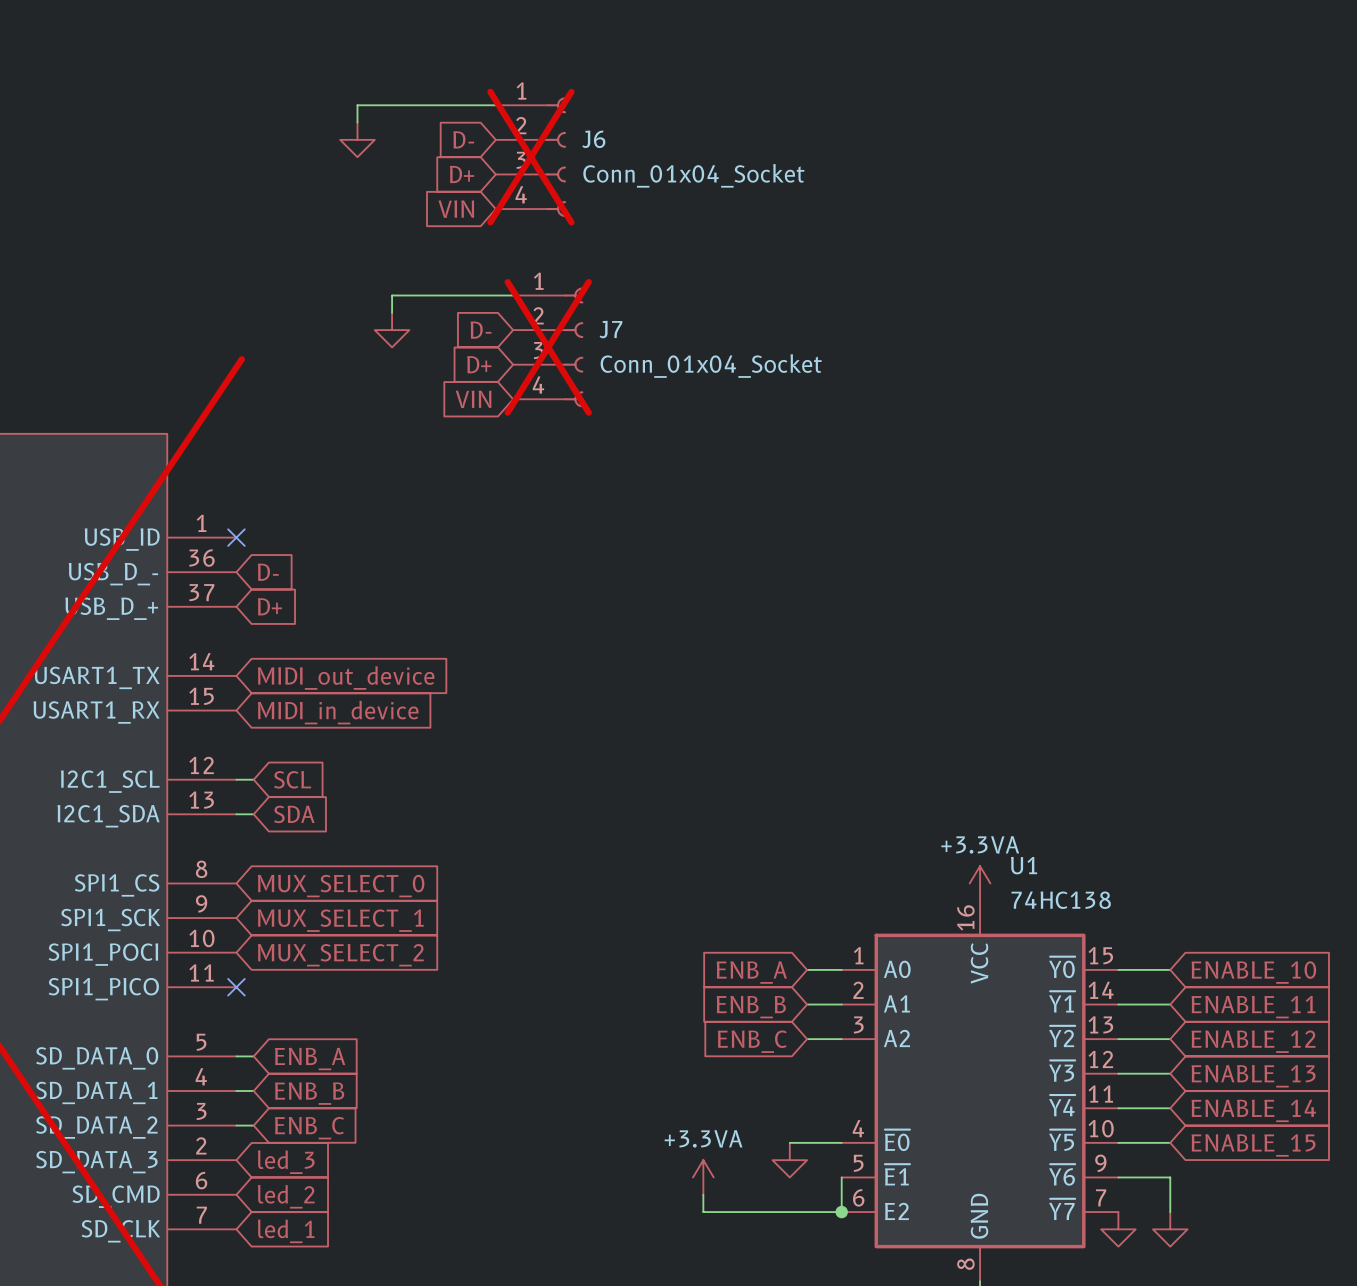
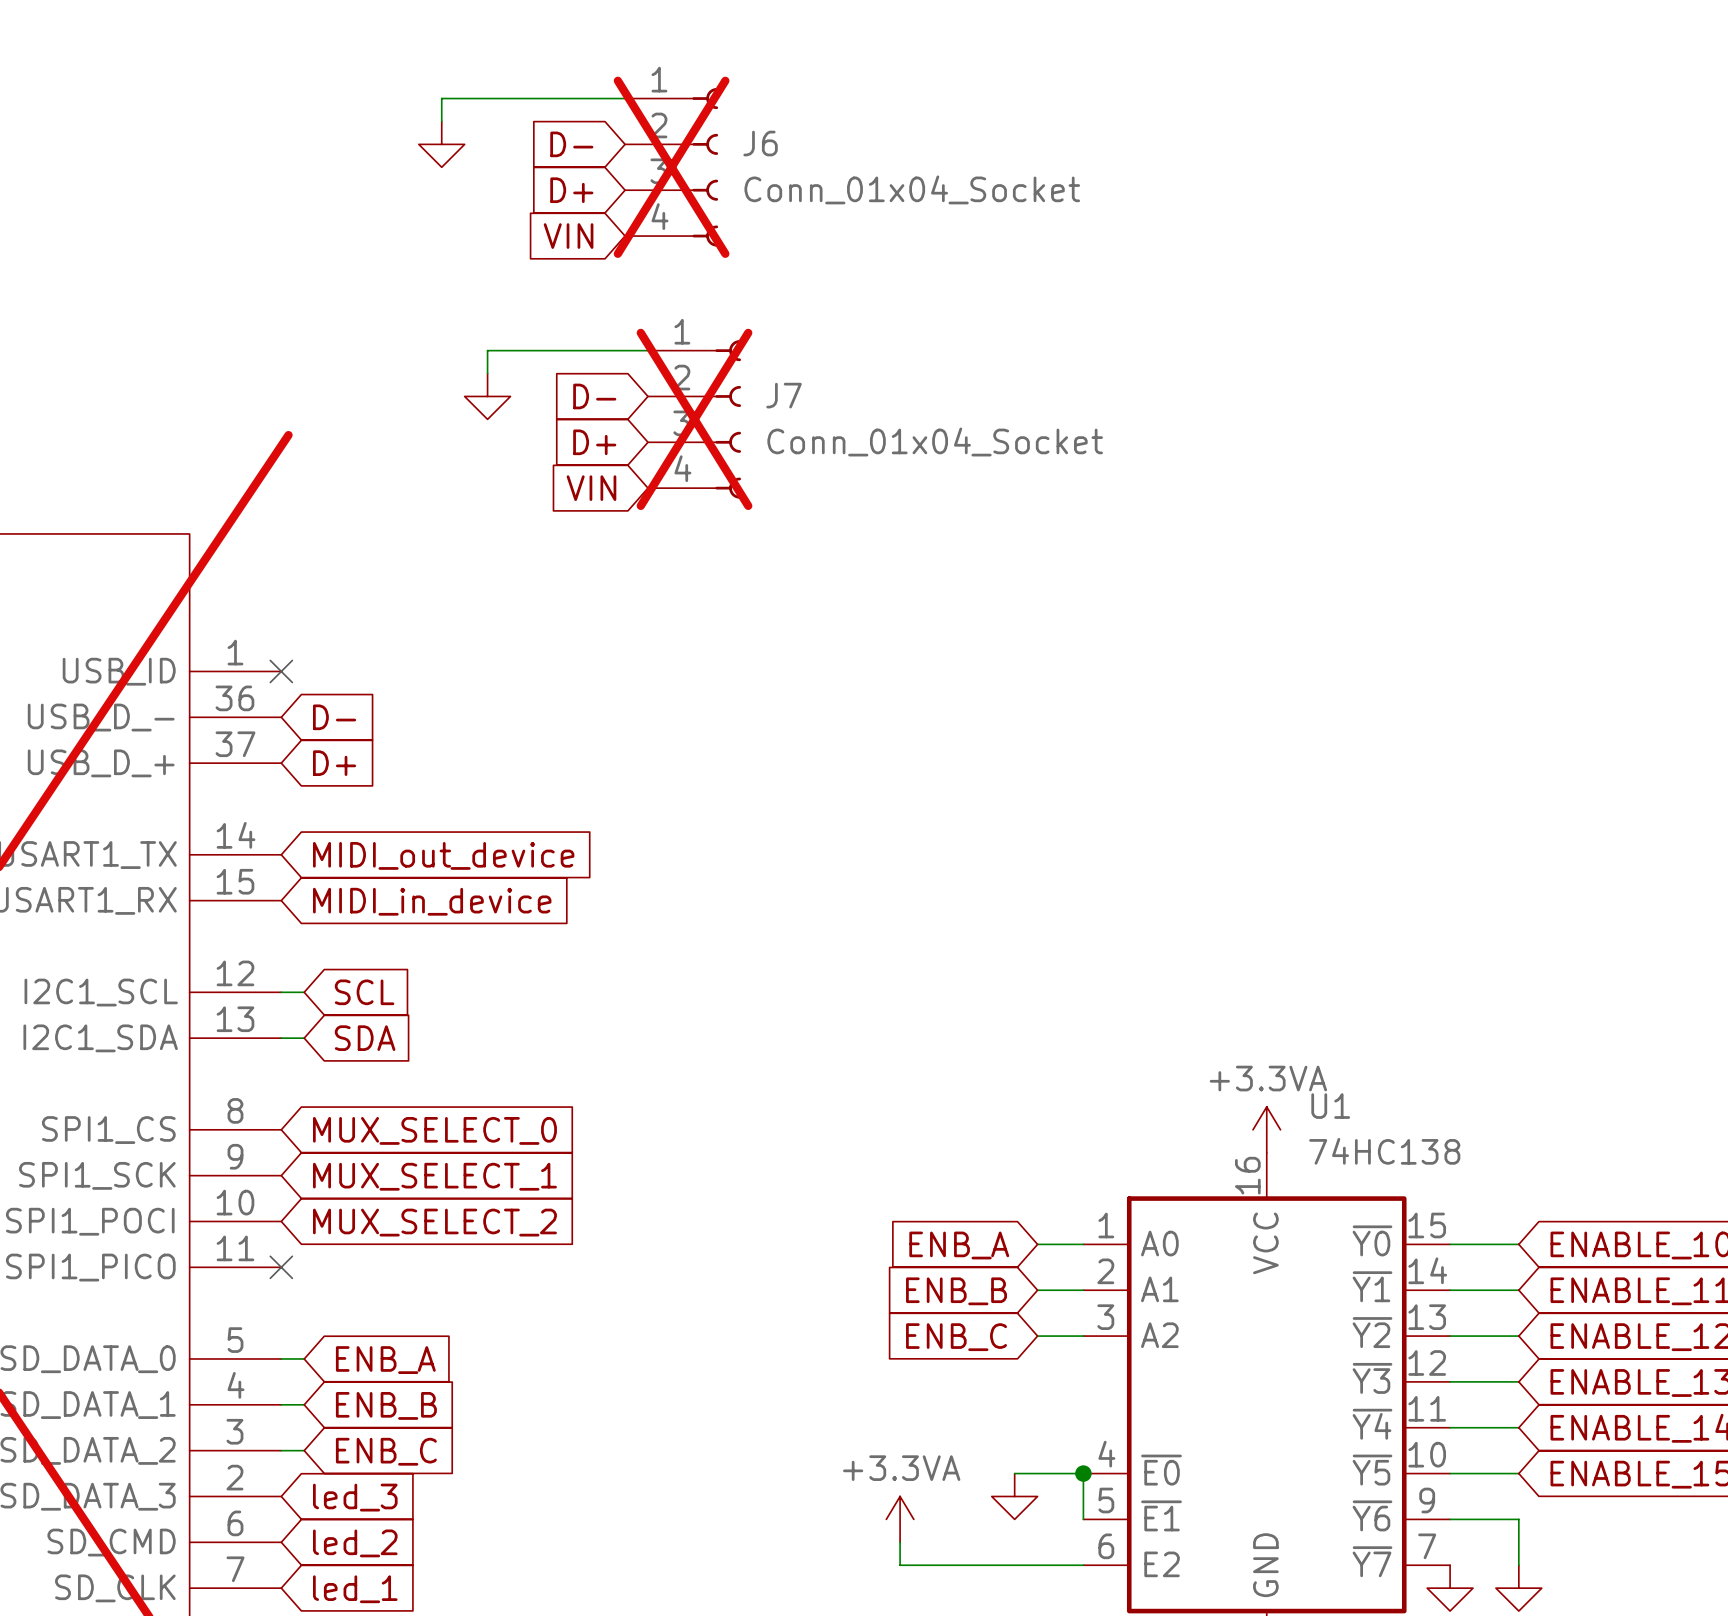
wire: (841, 1177) (841, 1212) -> (1083, 1519) (1083, 1473)
junction position: (841, 1212) -> (1083, 1473)

